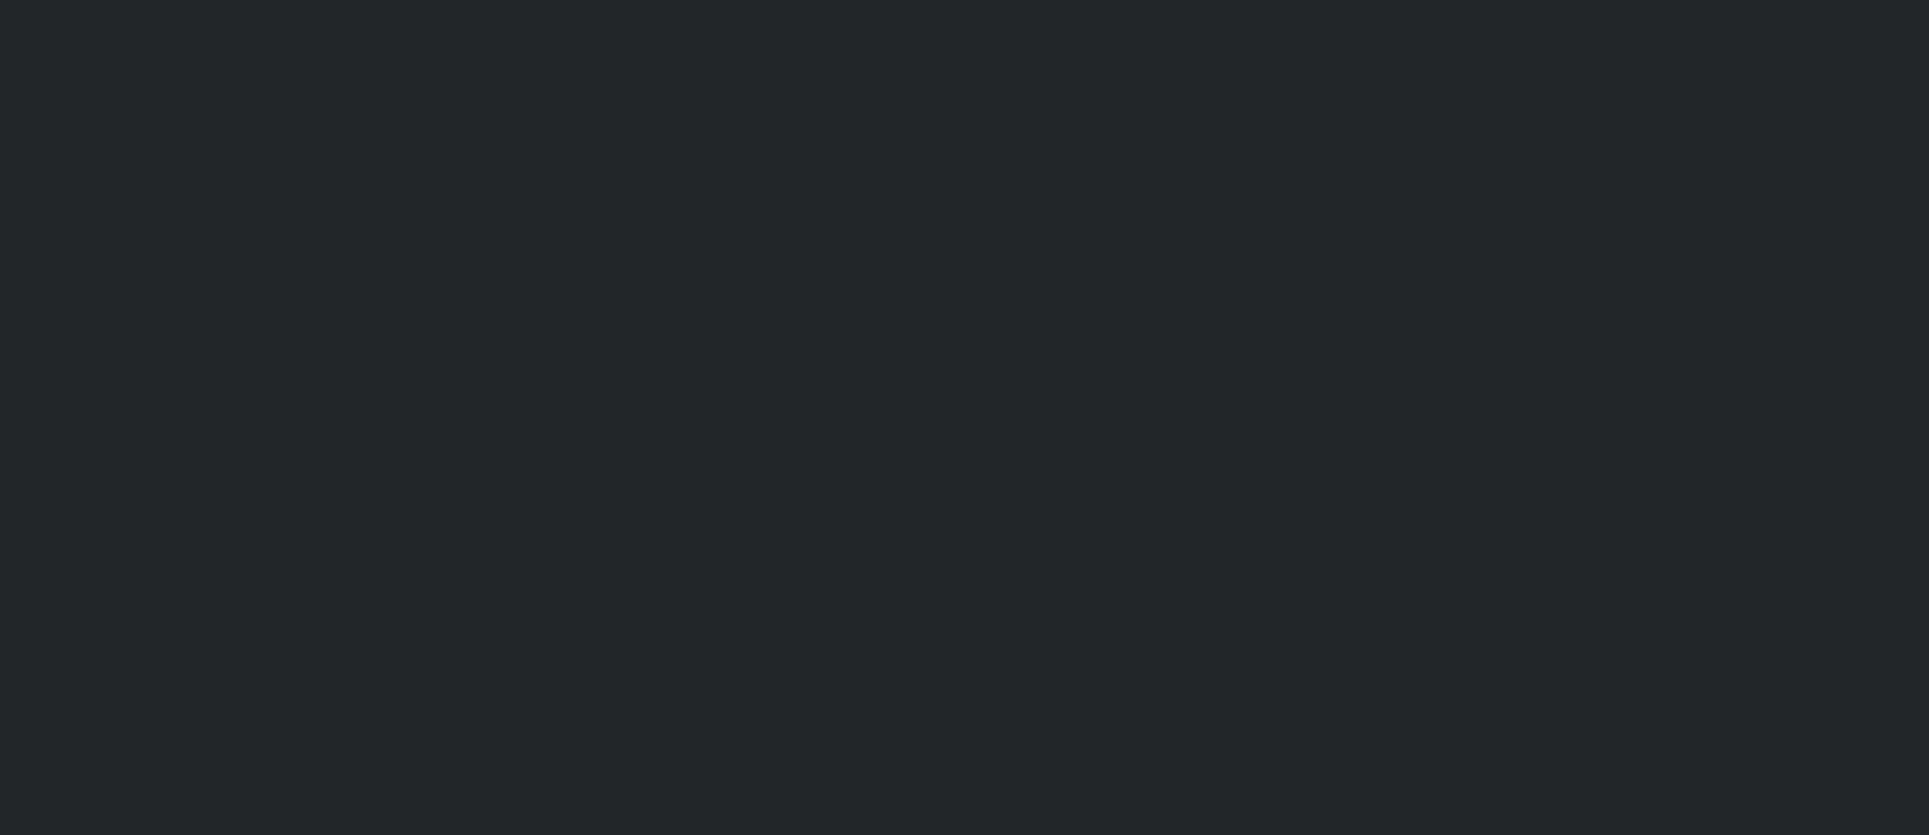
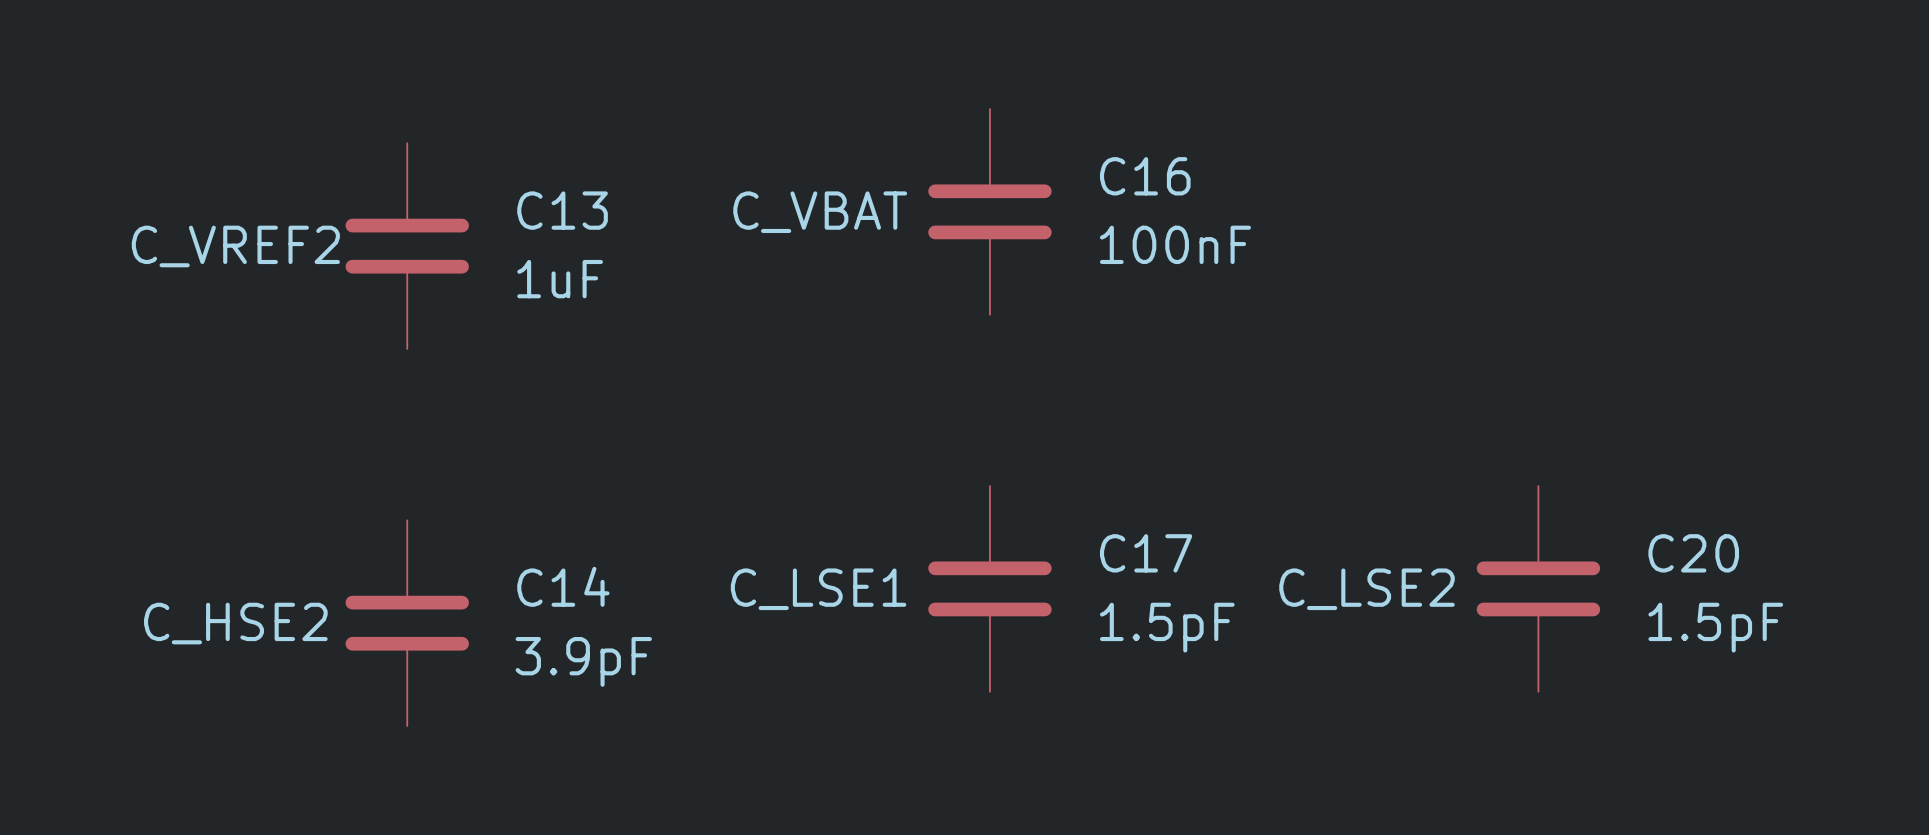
C16: none -> 100nF (989, 211)
C13: none -> 1uF (407, 246)
C17: none -> 1.5pF (989, 588)
C20: none -> 1.5pF (1538, 588)
C14: none -> 3.9pF (407, 623)

